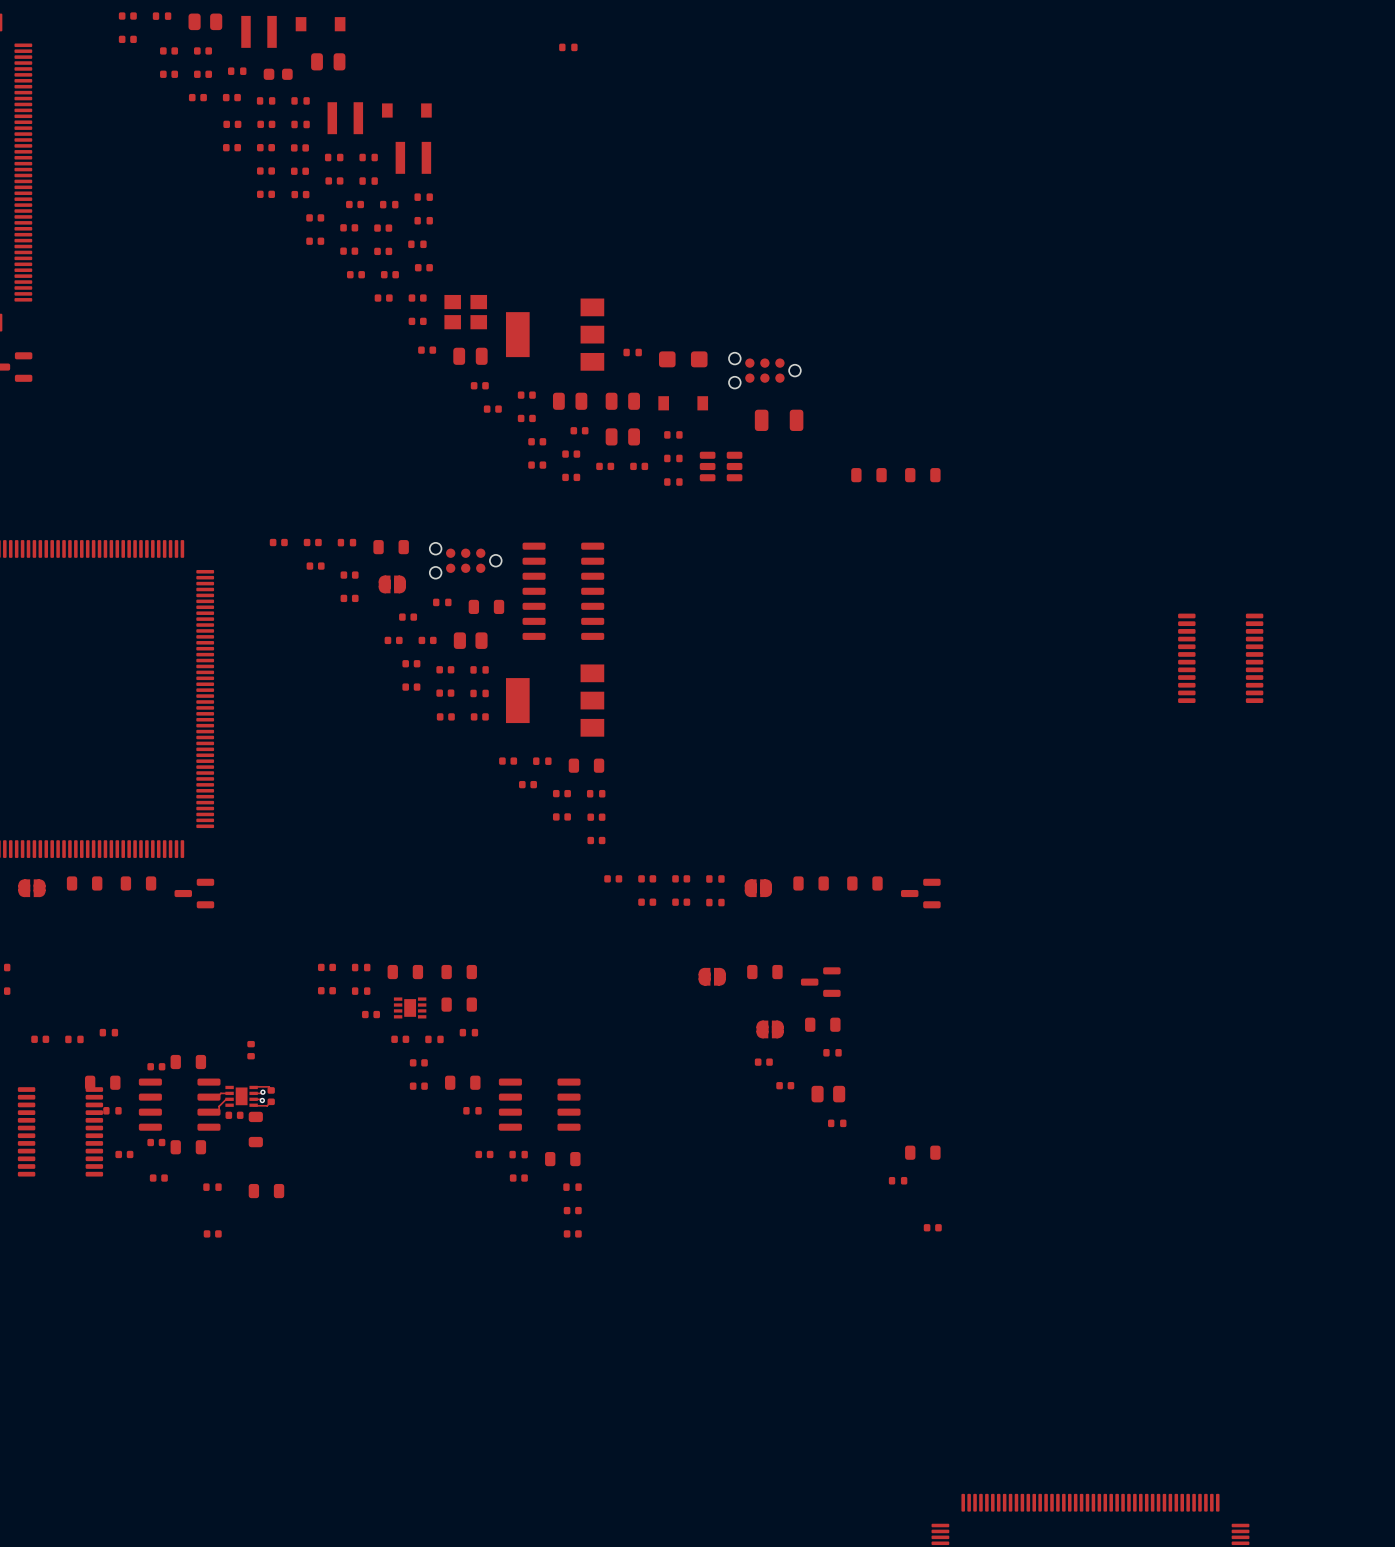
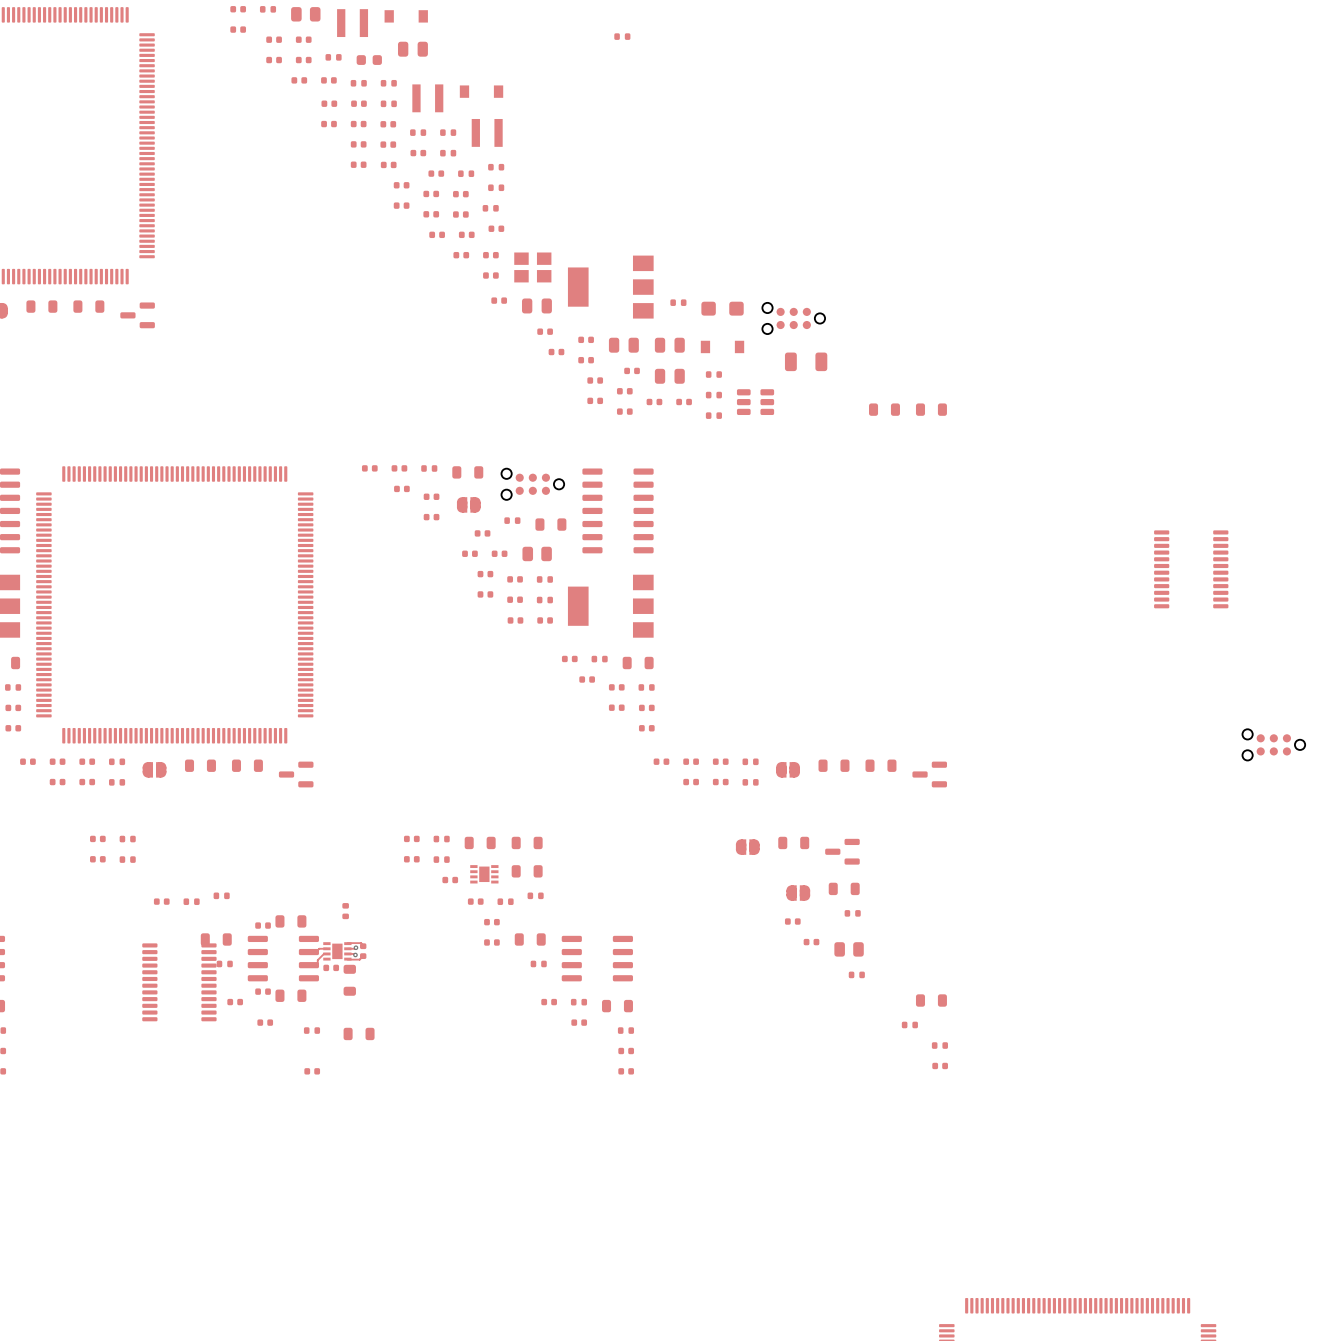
part: none -> (1273, 744)
part: none -> (939, 1045)

